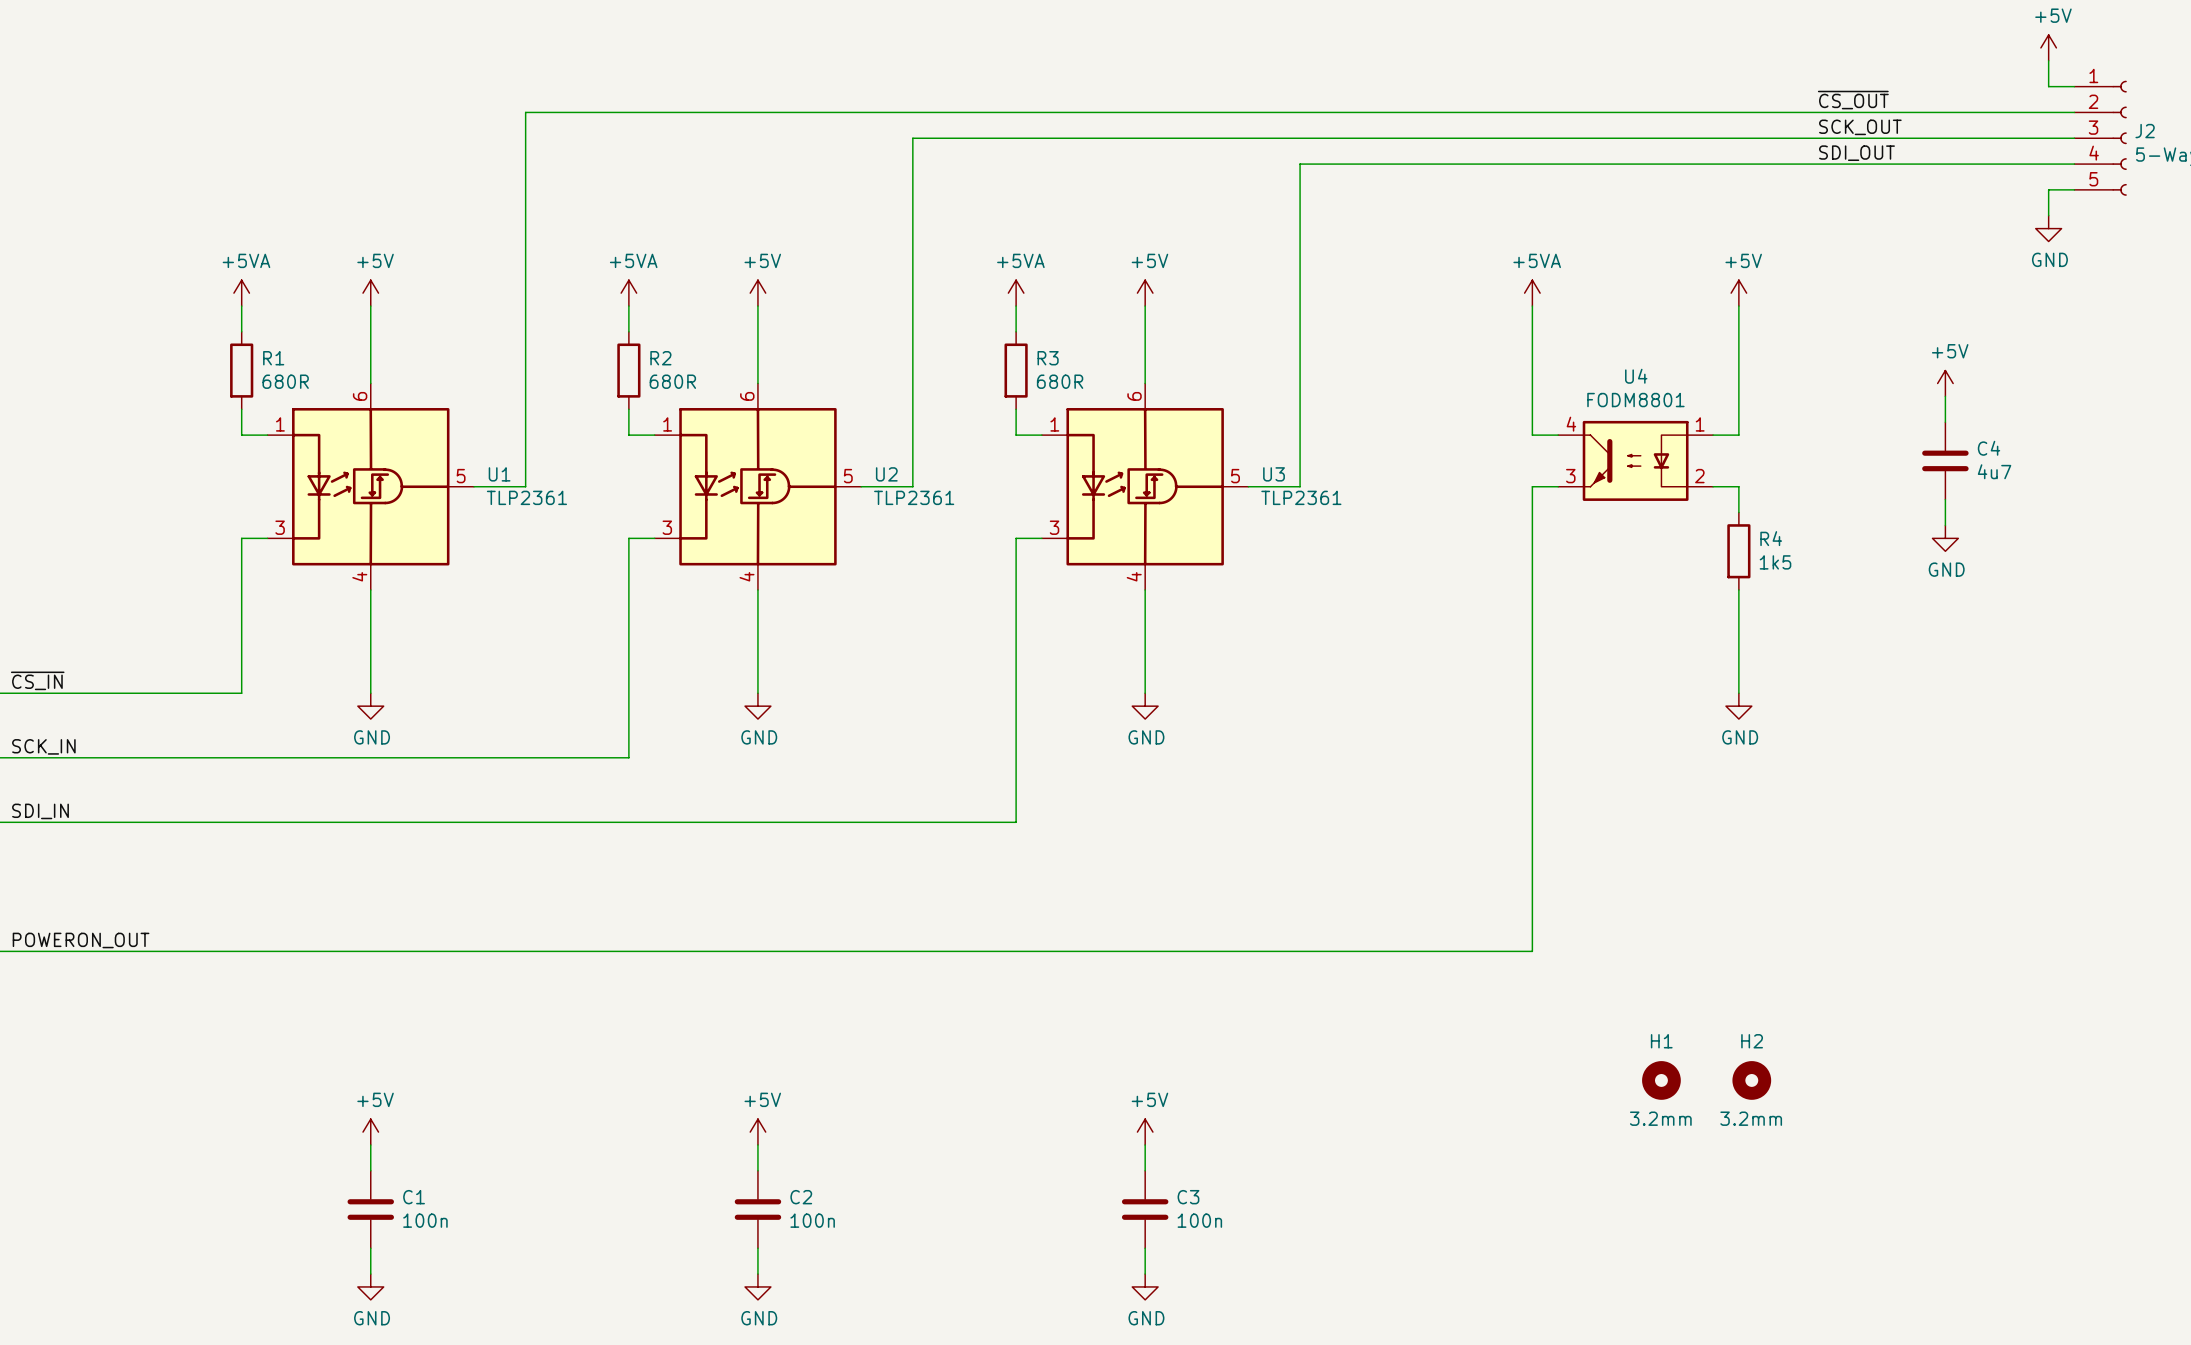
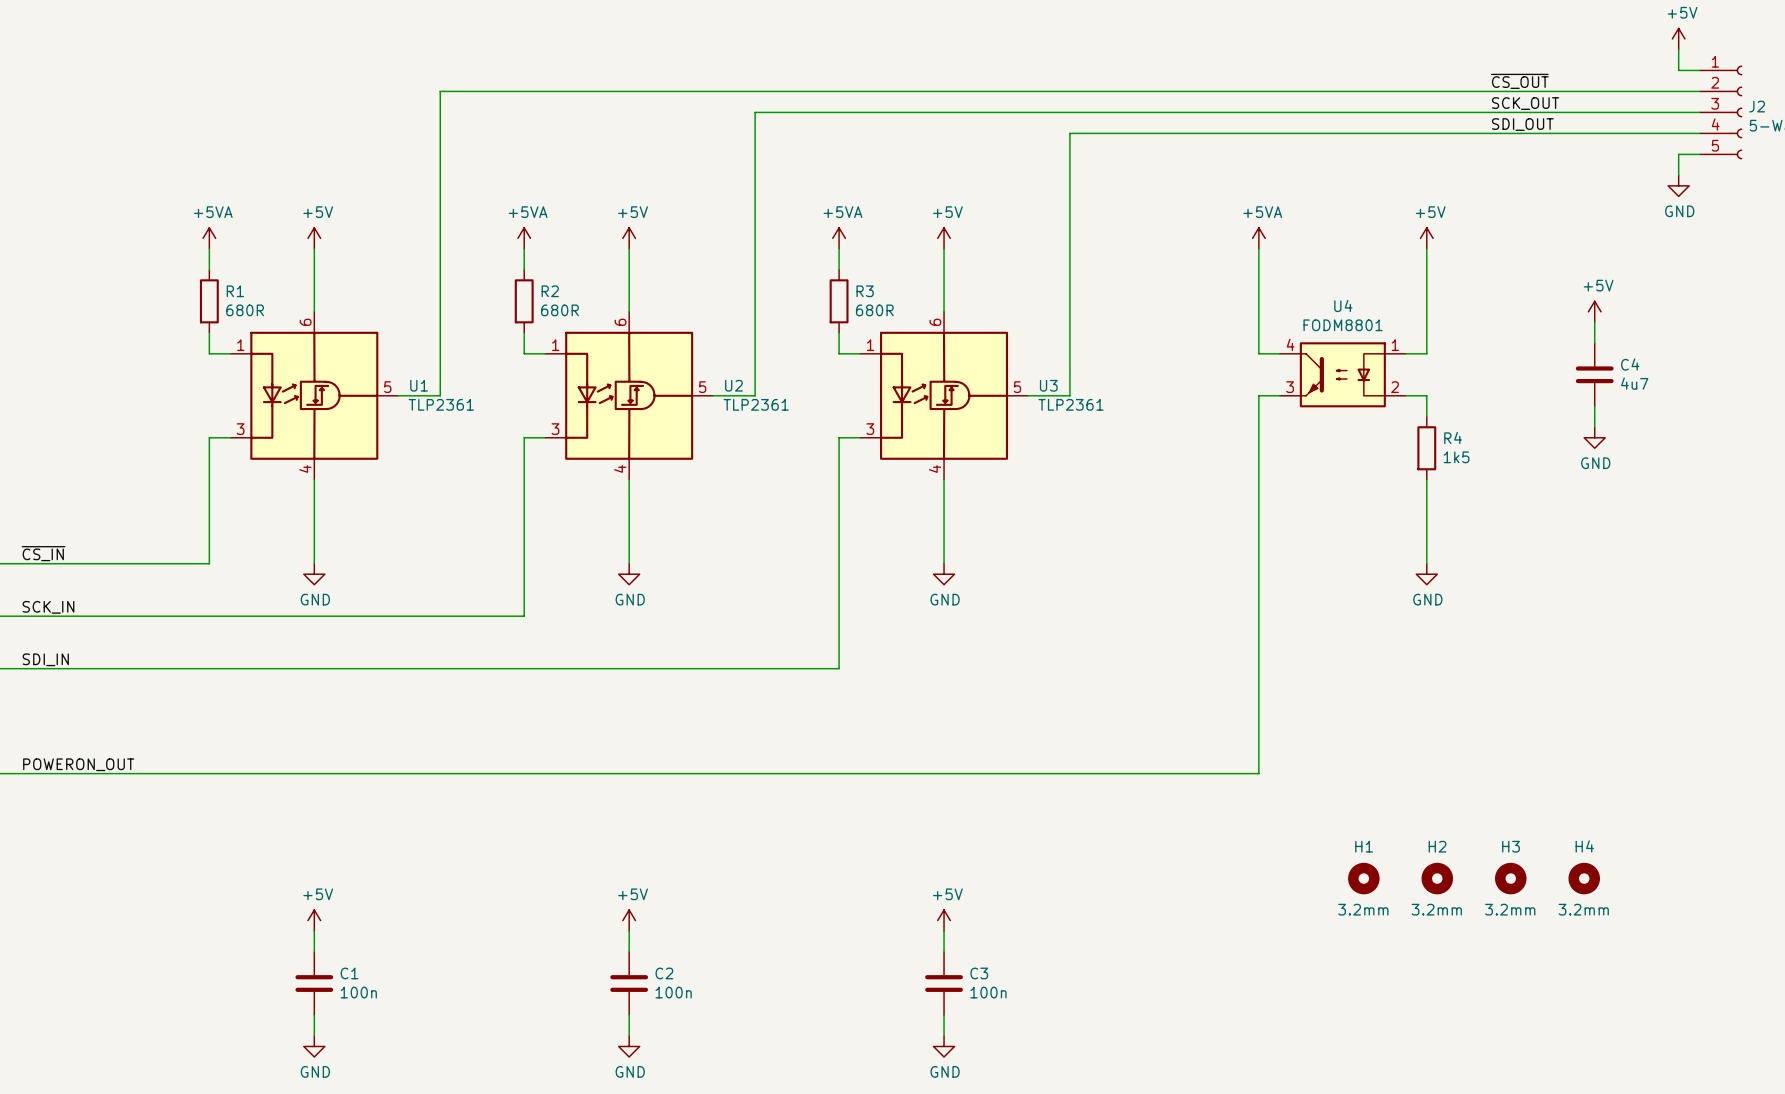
H3: none -> 3.2mm (1510, 878)
H4: none -> 3.2mm (1584, 878)

